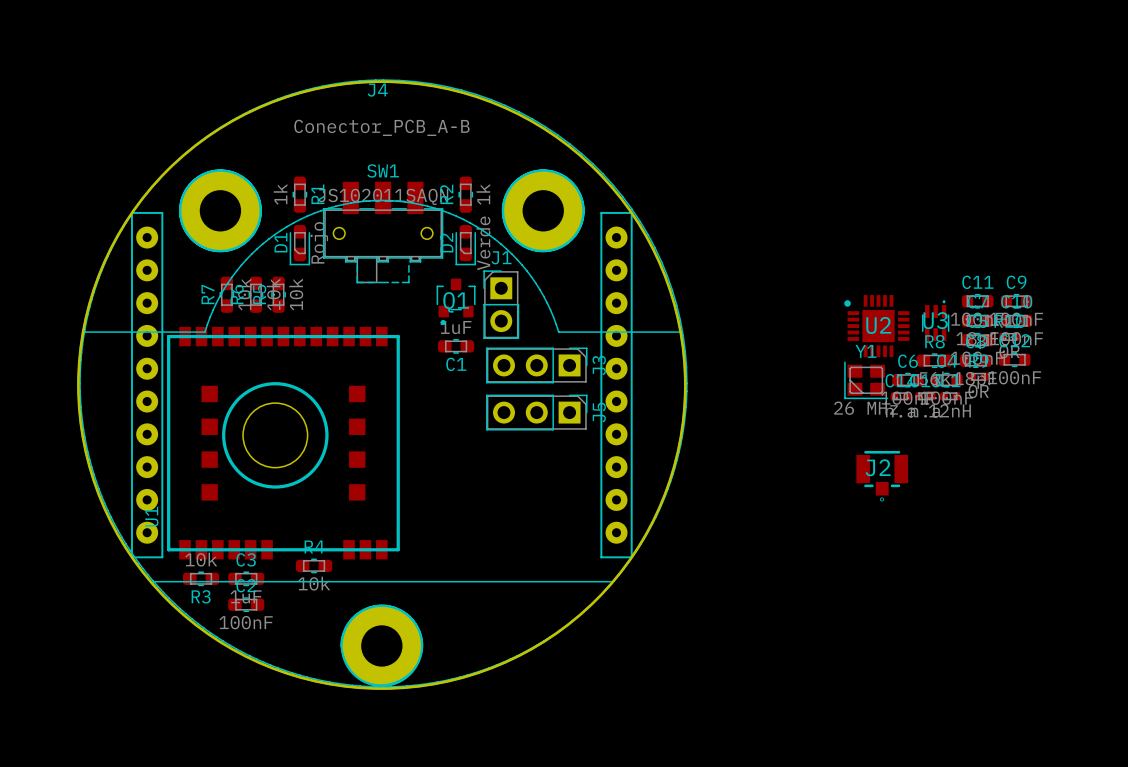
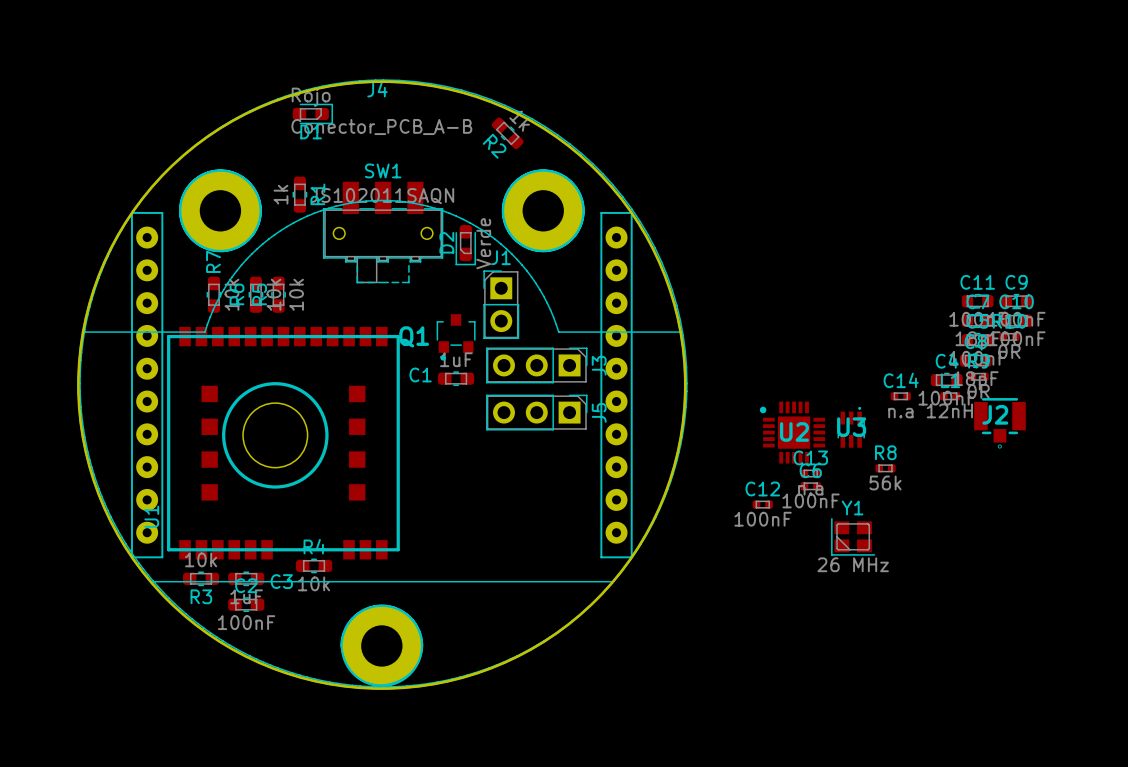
R2 rotation: 0° (465, 194) -> 45° counterclockwise (507, 133)
R2 position: (465, 194) -> (507, 133)
D1 rotation: 0° (299, 245) -> 90° counterclockwise (312, 113)
D1 position: (299, 245) -> (312, 113)
R7 name position: R7 (207, 294) -> R7 (213, 261)
R7 position: (226, 294) -> (213, 294)
Q1 position: (456, 301) -> (456, 337)
Q1 name position: Q1 (456, 302) -> Q1 (414, 336)
U3 position: (935, 320) -> (851, 427)
U2 position: (876, 326) -> (792, 432)
C1 position: (456, 346) -> (456, 378)
C12 footprint: [998, 352, 1031, 368] -> [752, 500, 773, 509]
R8 footprint: [916, 353, 953, 369] -> [875, 464, 896, 473]
C1 name position: C1 (456, 364) -> C1 (420, 374)
C6 footprint: [892, 372, 924, 388] -> [800, 482, 821, 491]
Y1 position: (866, 380) -> (853, 536)
C13 position: (925, 396) -> (810, 473)
J2 position: (882, 476) -> (999, 423)
C3 name position: C3 (246, 559) -> C3 (281, 581)

